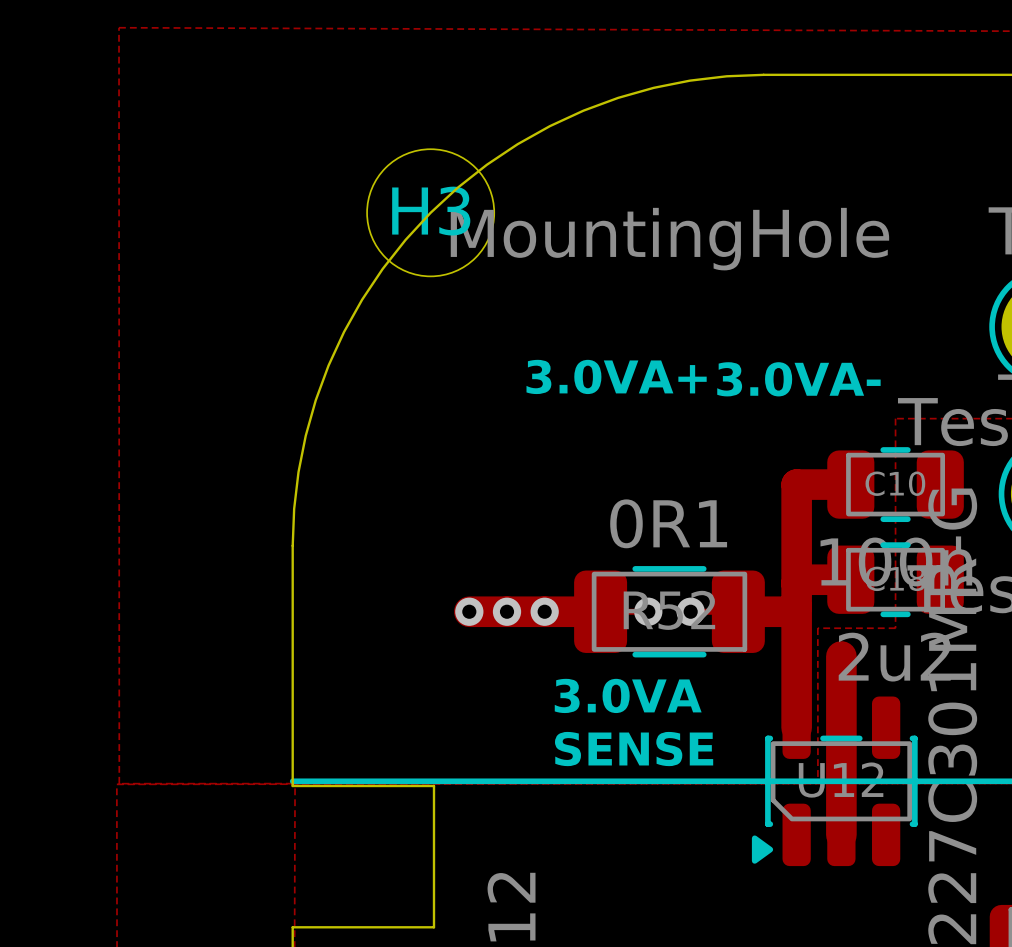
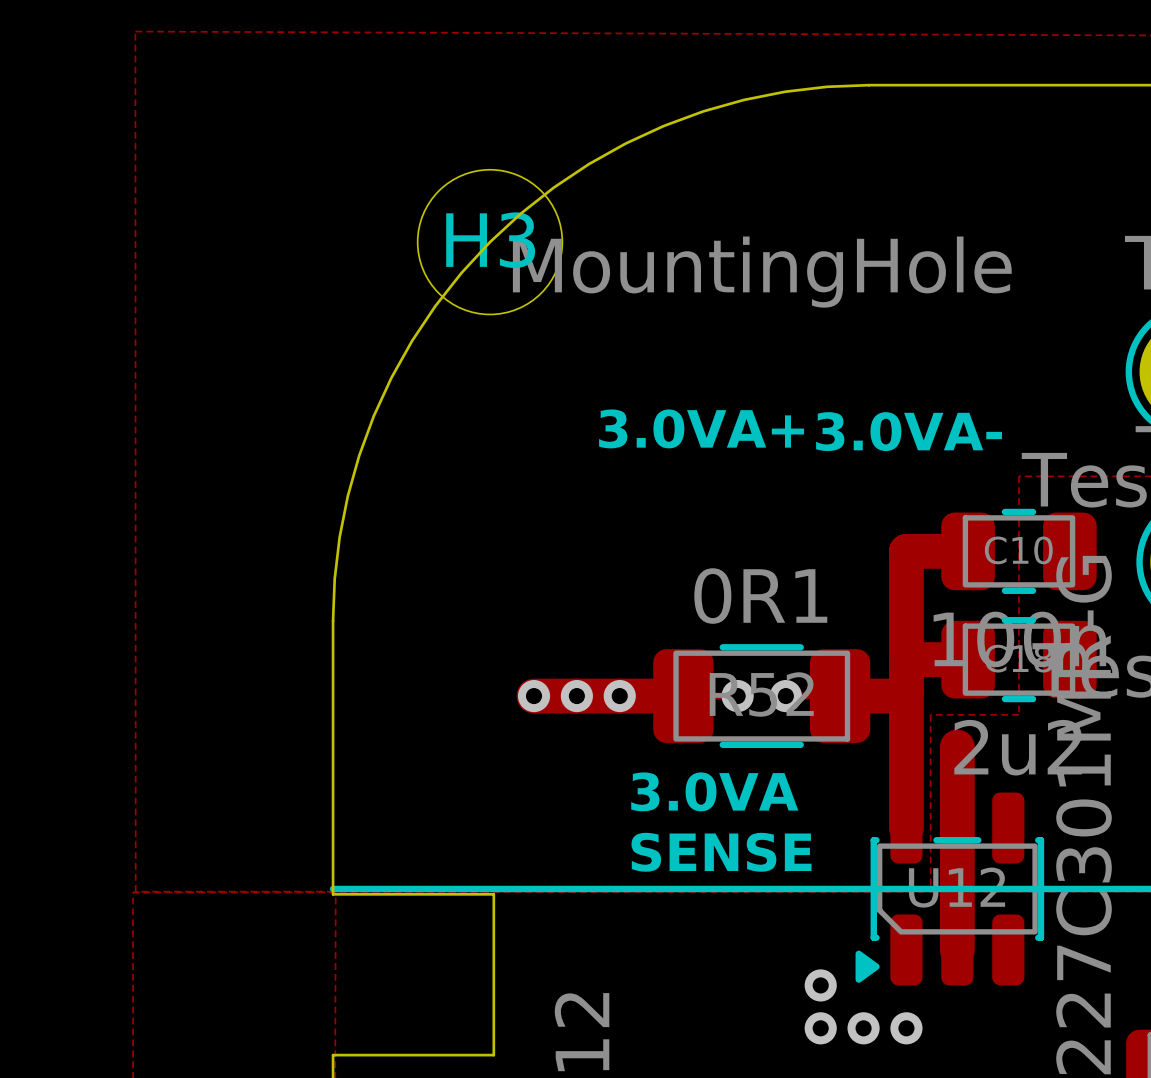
via: none -> (820, 985)
via: none -> (820, 1028)
via: none -> (863, 1028)
via: none -> (906, 1028)

